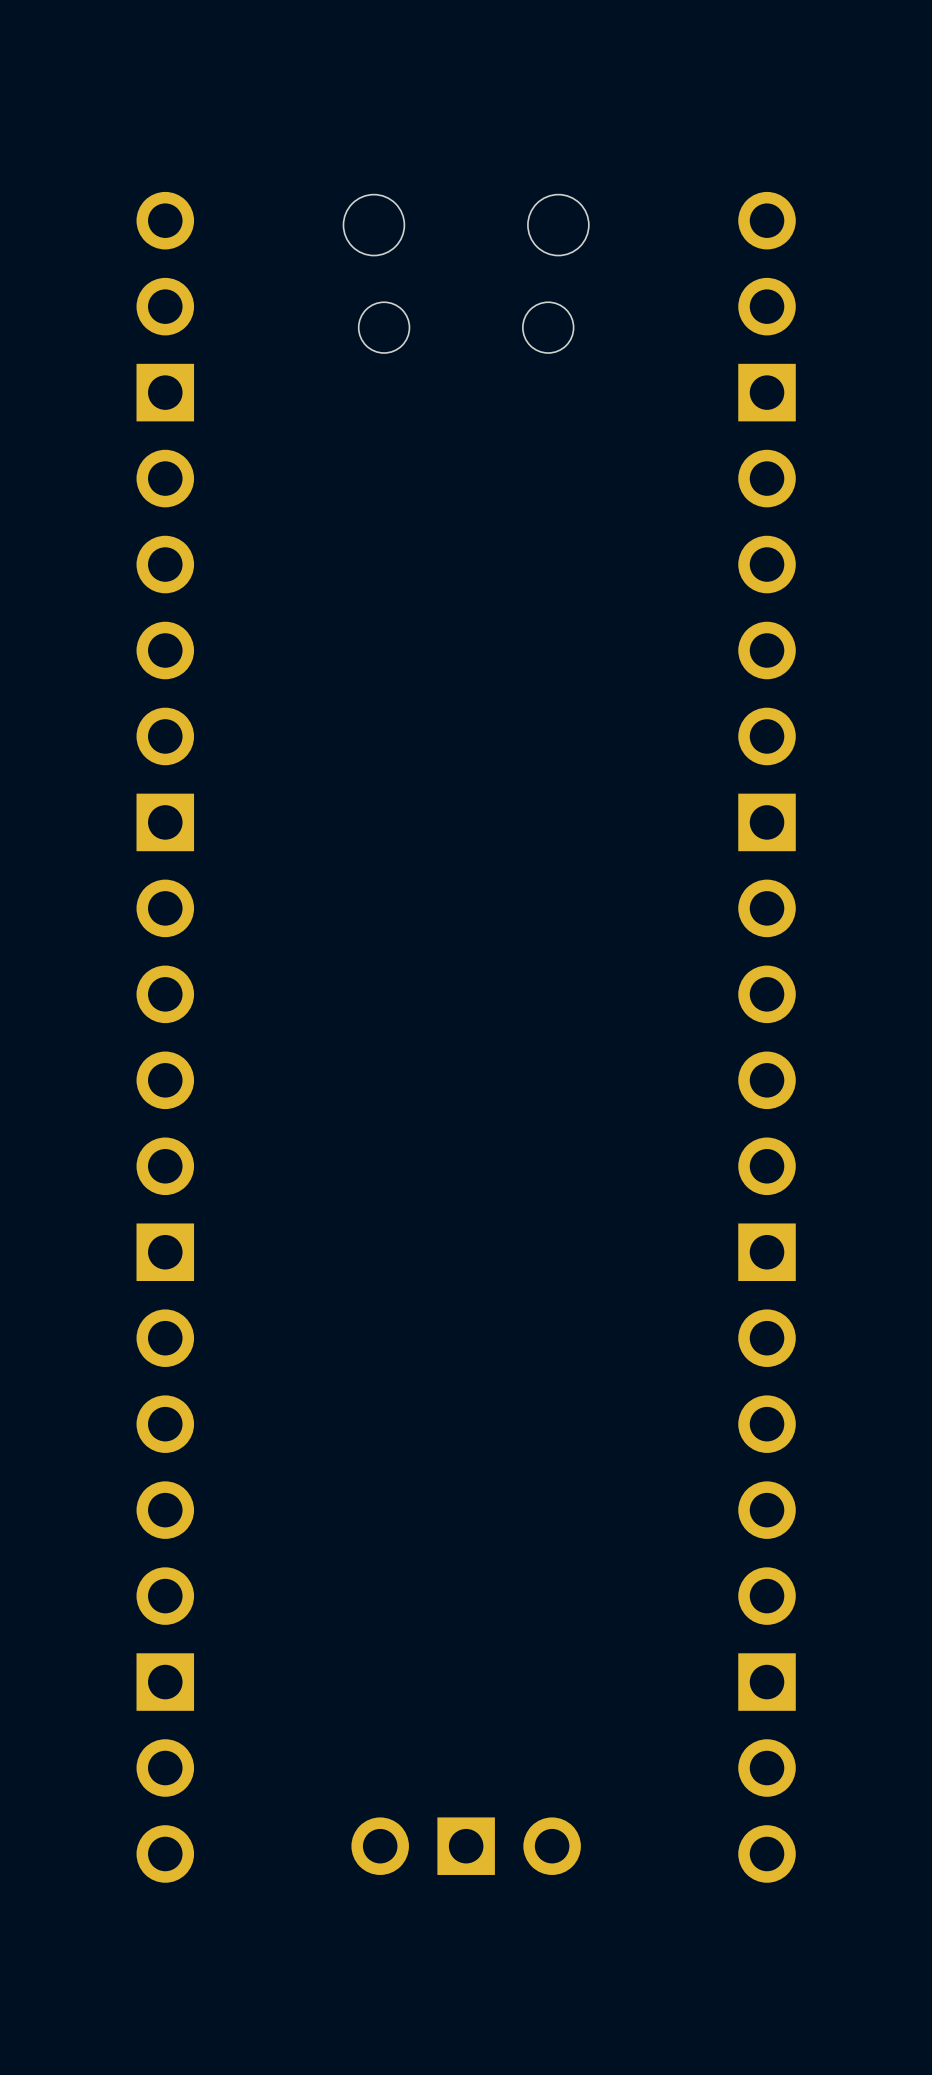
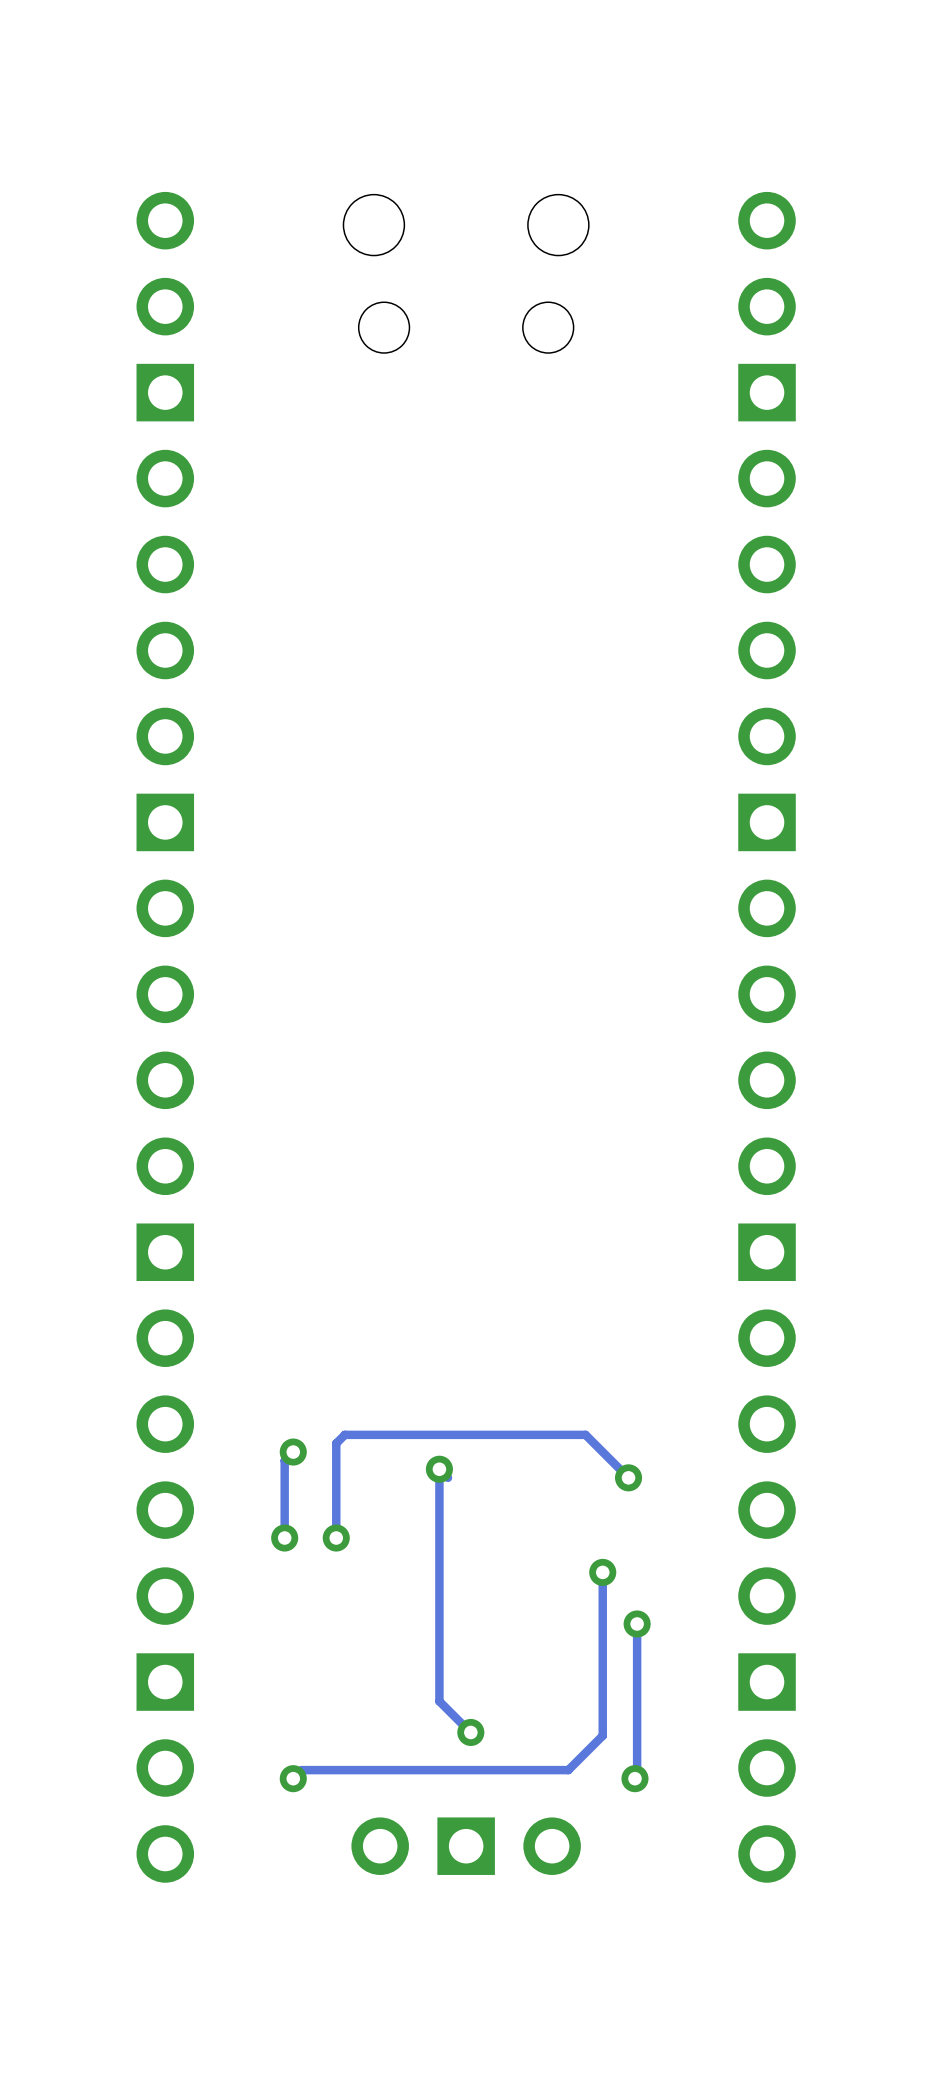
track: none -> (293, 1452) (284, 1460) (284, 1538)
via: none -> (293, 1452)
via: none -> (439, 1469)
track: none -> (448, 1477) (439, 1469) (439, 1701) (465, 1727)
track: none -> (628, 1477) (585, 1434) (344, 1434) (336, 1443) (336, 1538)
via: none -> (628, 1477)
via: none -> (284, 1538)
via: none -> (336, 1538)
track: none -> (602, 1572) (602, 1735) (568, 1770) (301, 1770) (293, 1778)
via: none -> (602, 1572)
track: none -> (637, 1623) (637, 1776) (634, 1778)
via: none -> (637, 1623)
via: none -> (470, 1732)
via: none -> (293, 1778)
via: none -> (634, 1778)

